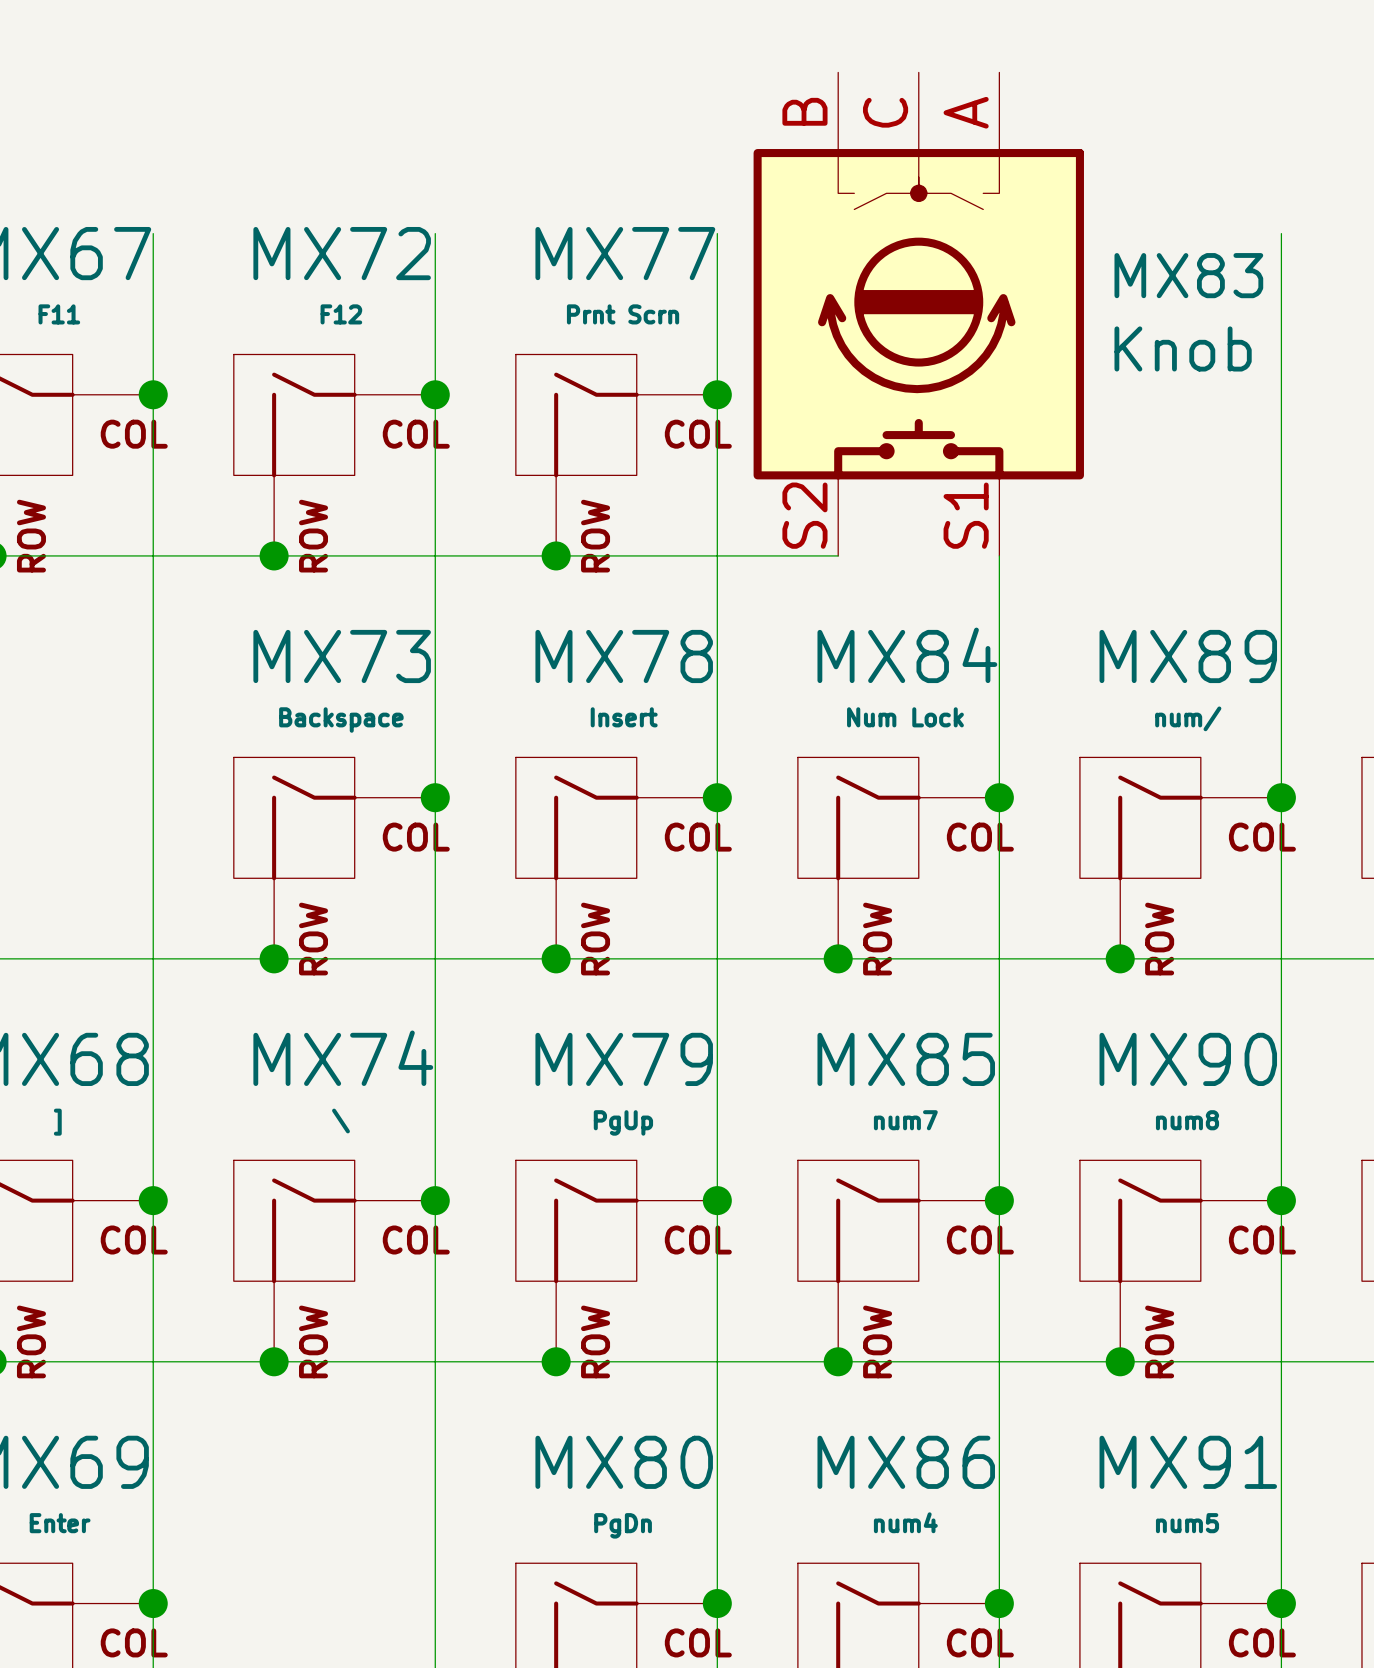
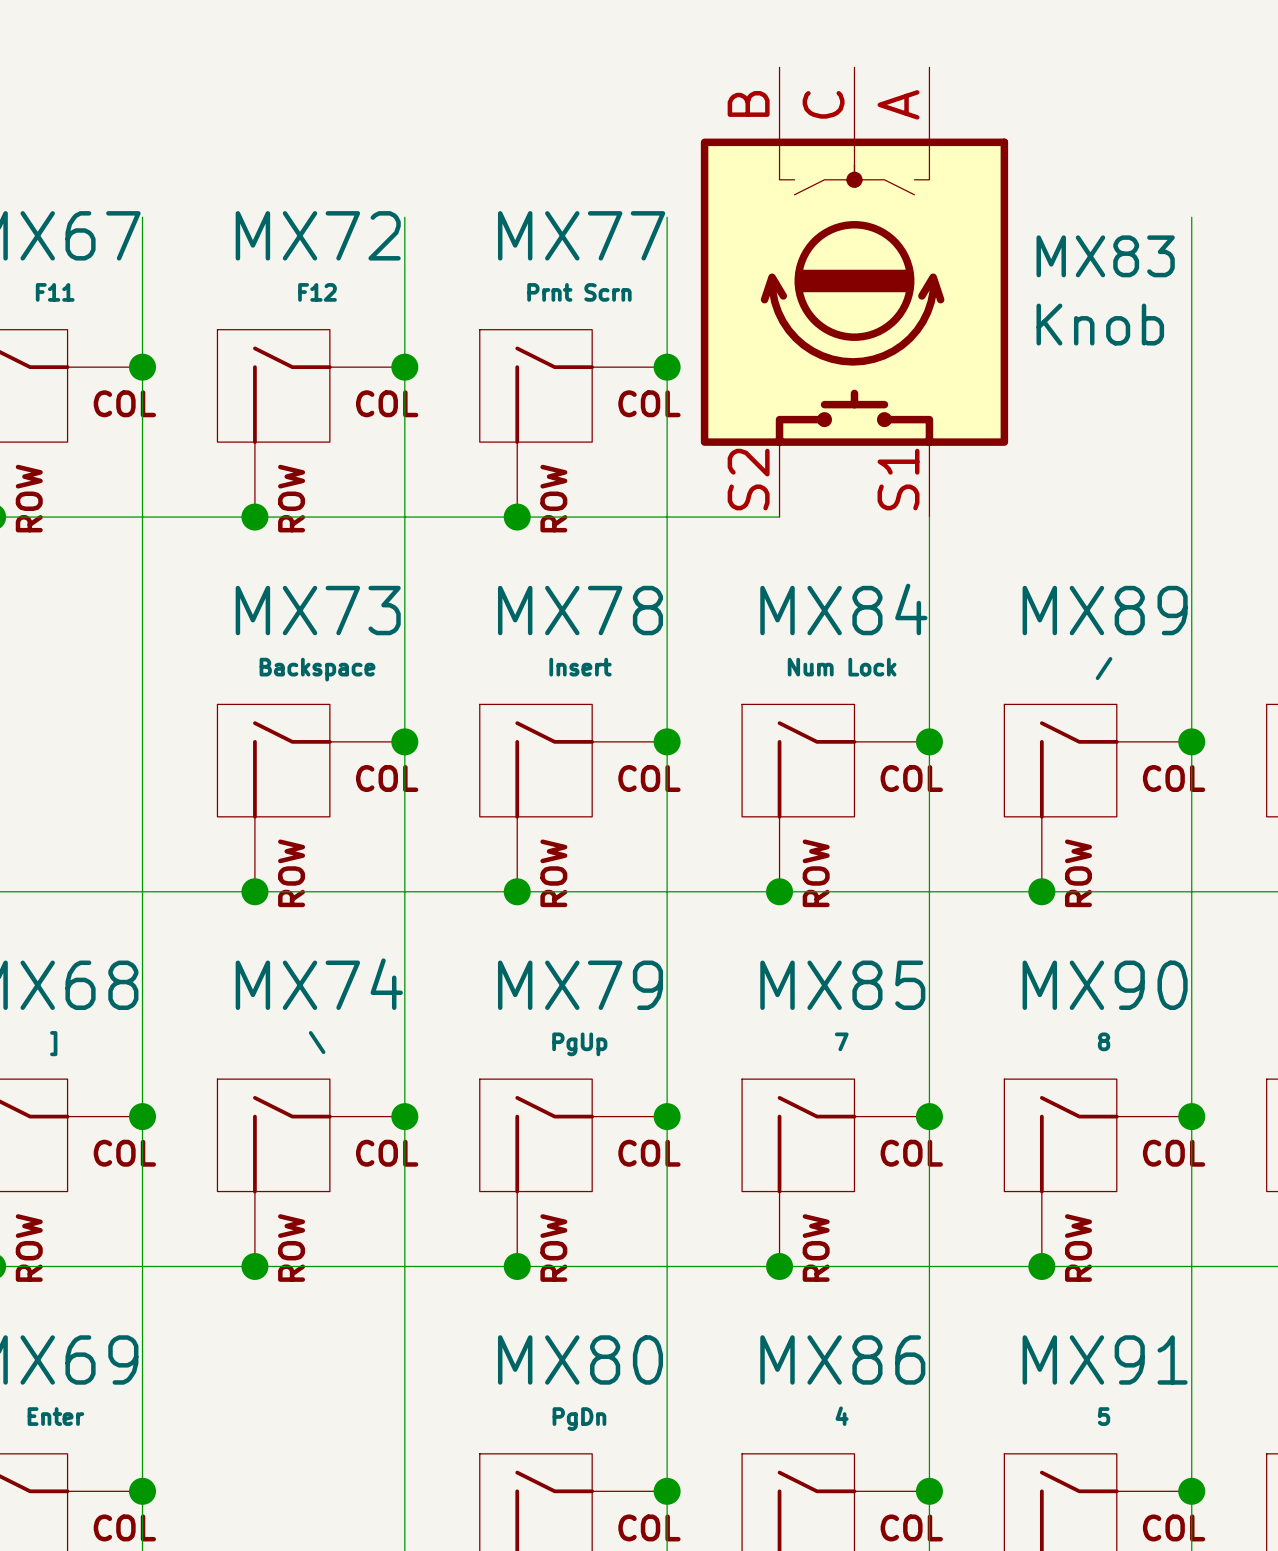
MX89 value: num/ (1188, 718) -> / (1104, 668)
MX85 value: num7 (905, 1120) -> 7 (841, 1041)
MX90 value: num8 (1187, 1120) -> 8 (1104, 1041)
MX86 value: num4 (905, 1522) -> 4 (842, 1416)
MX91 value: num5 (1187, 1523) -> 5 (1104, 1416)

